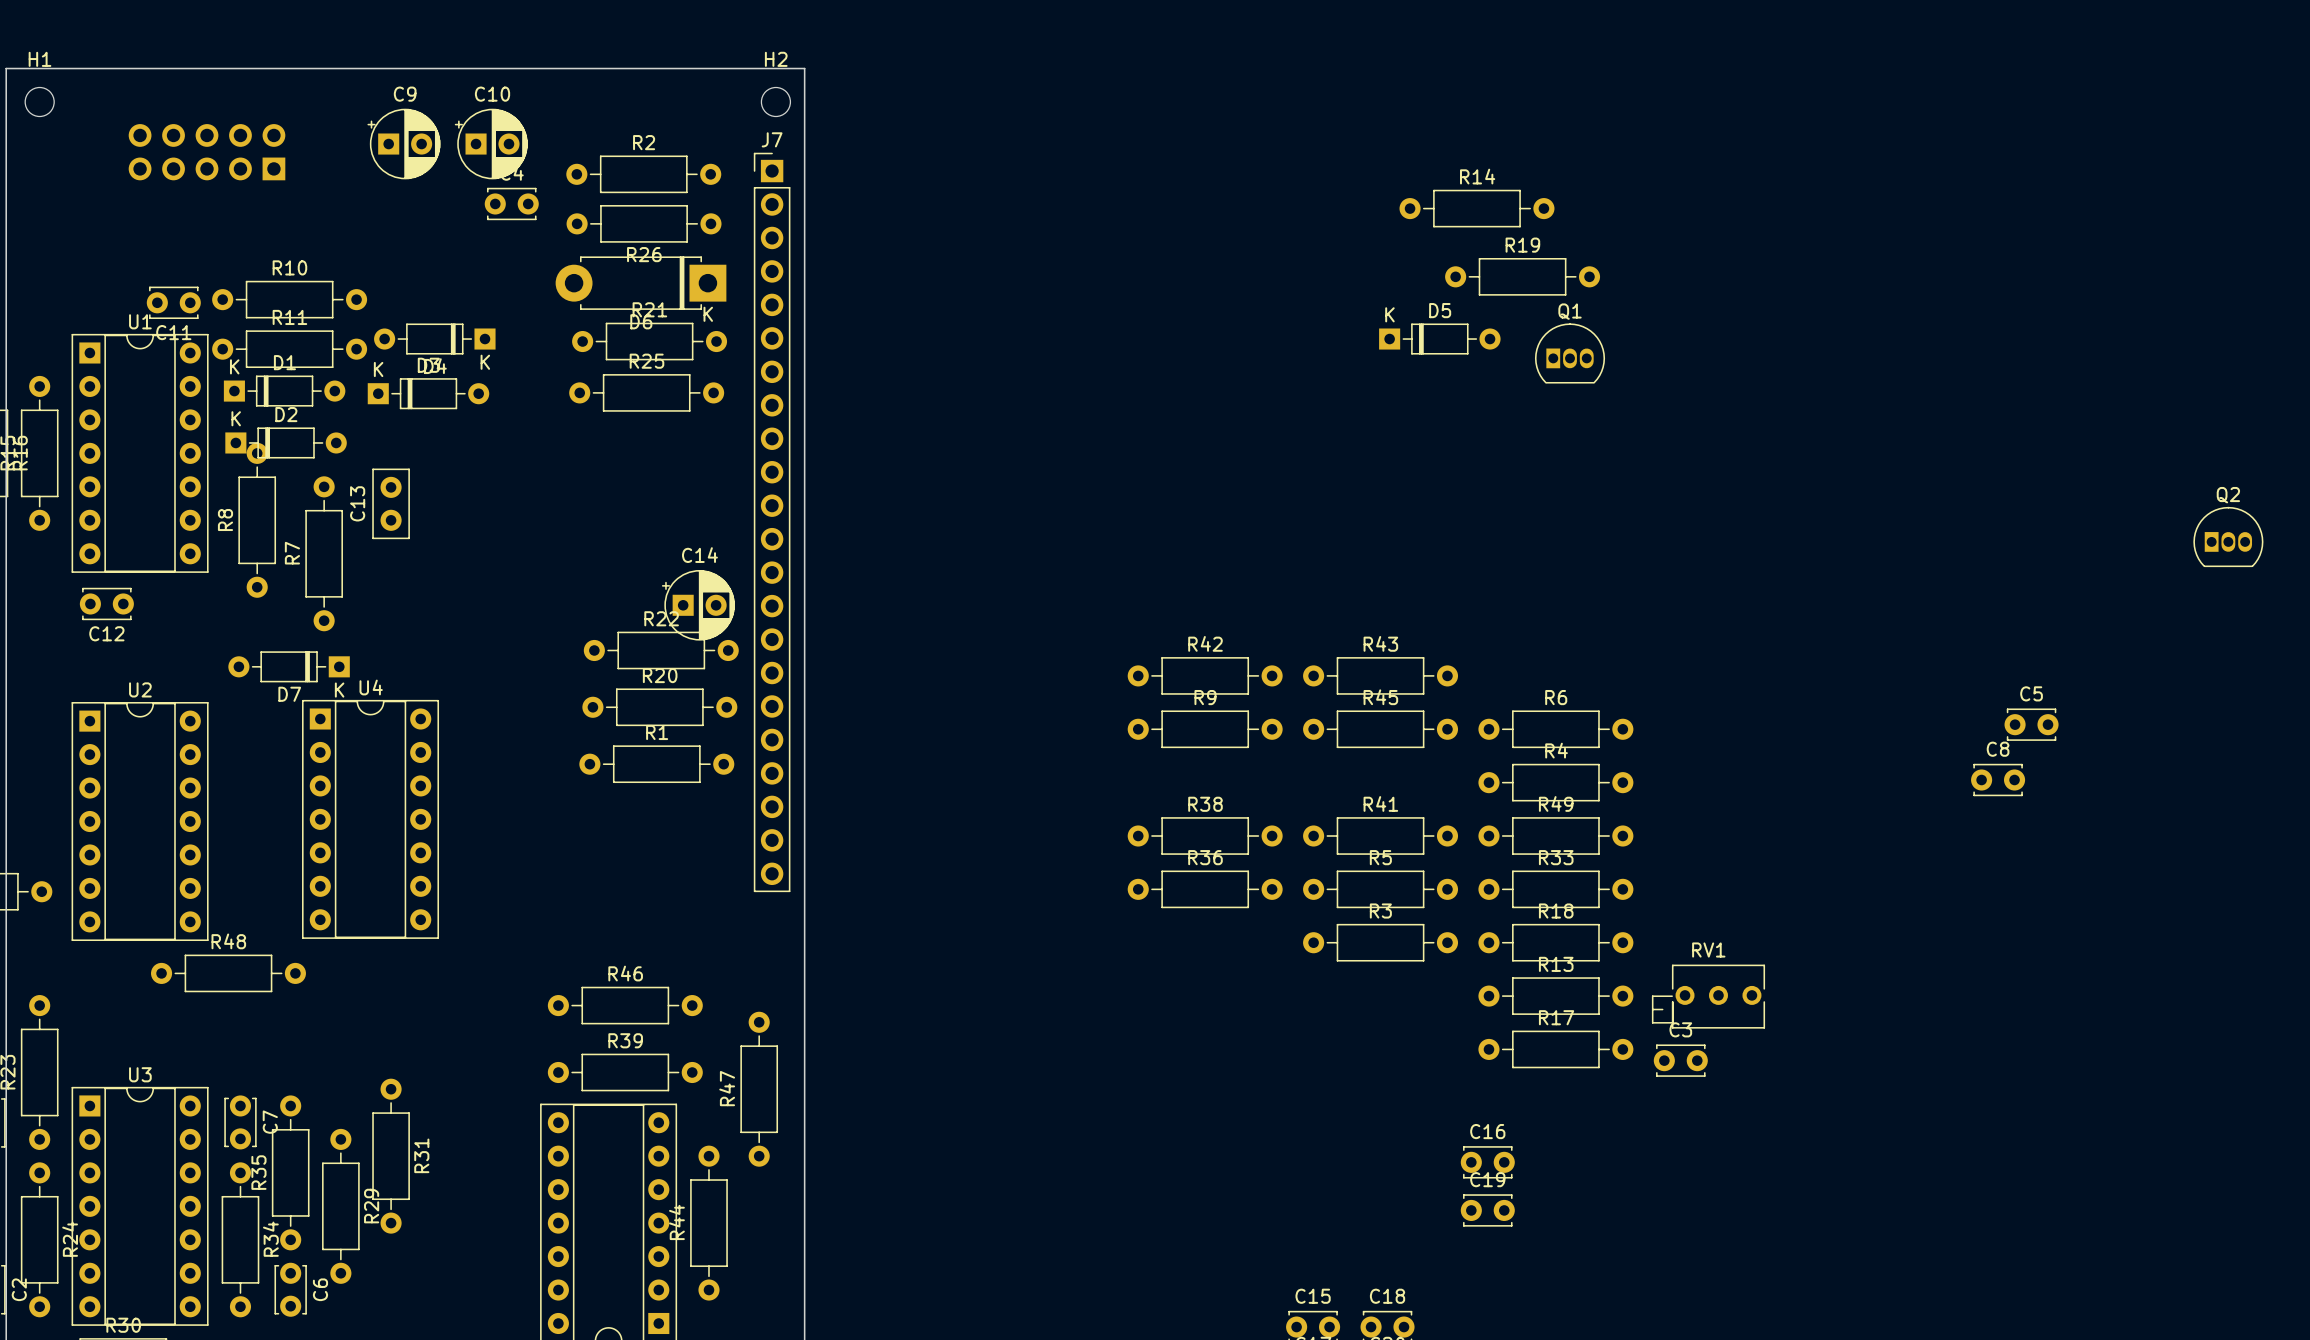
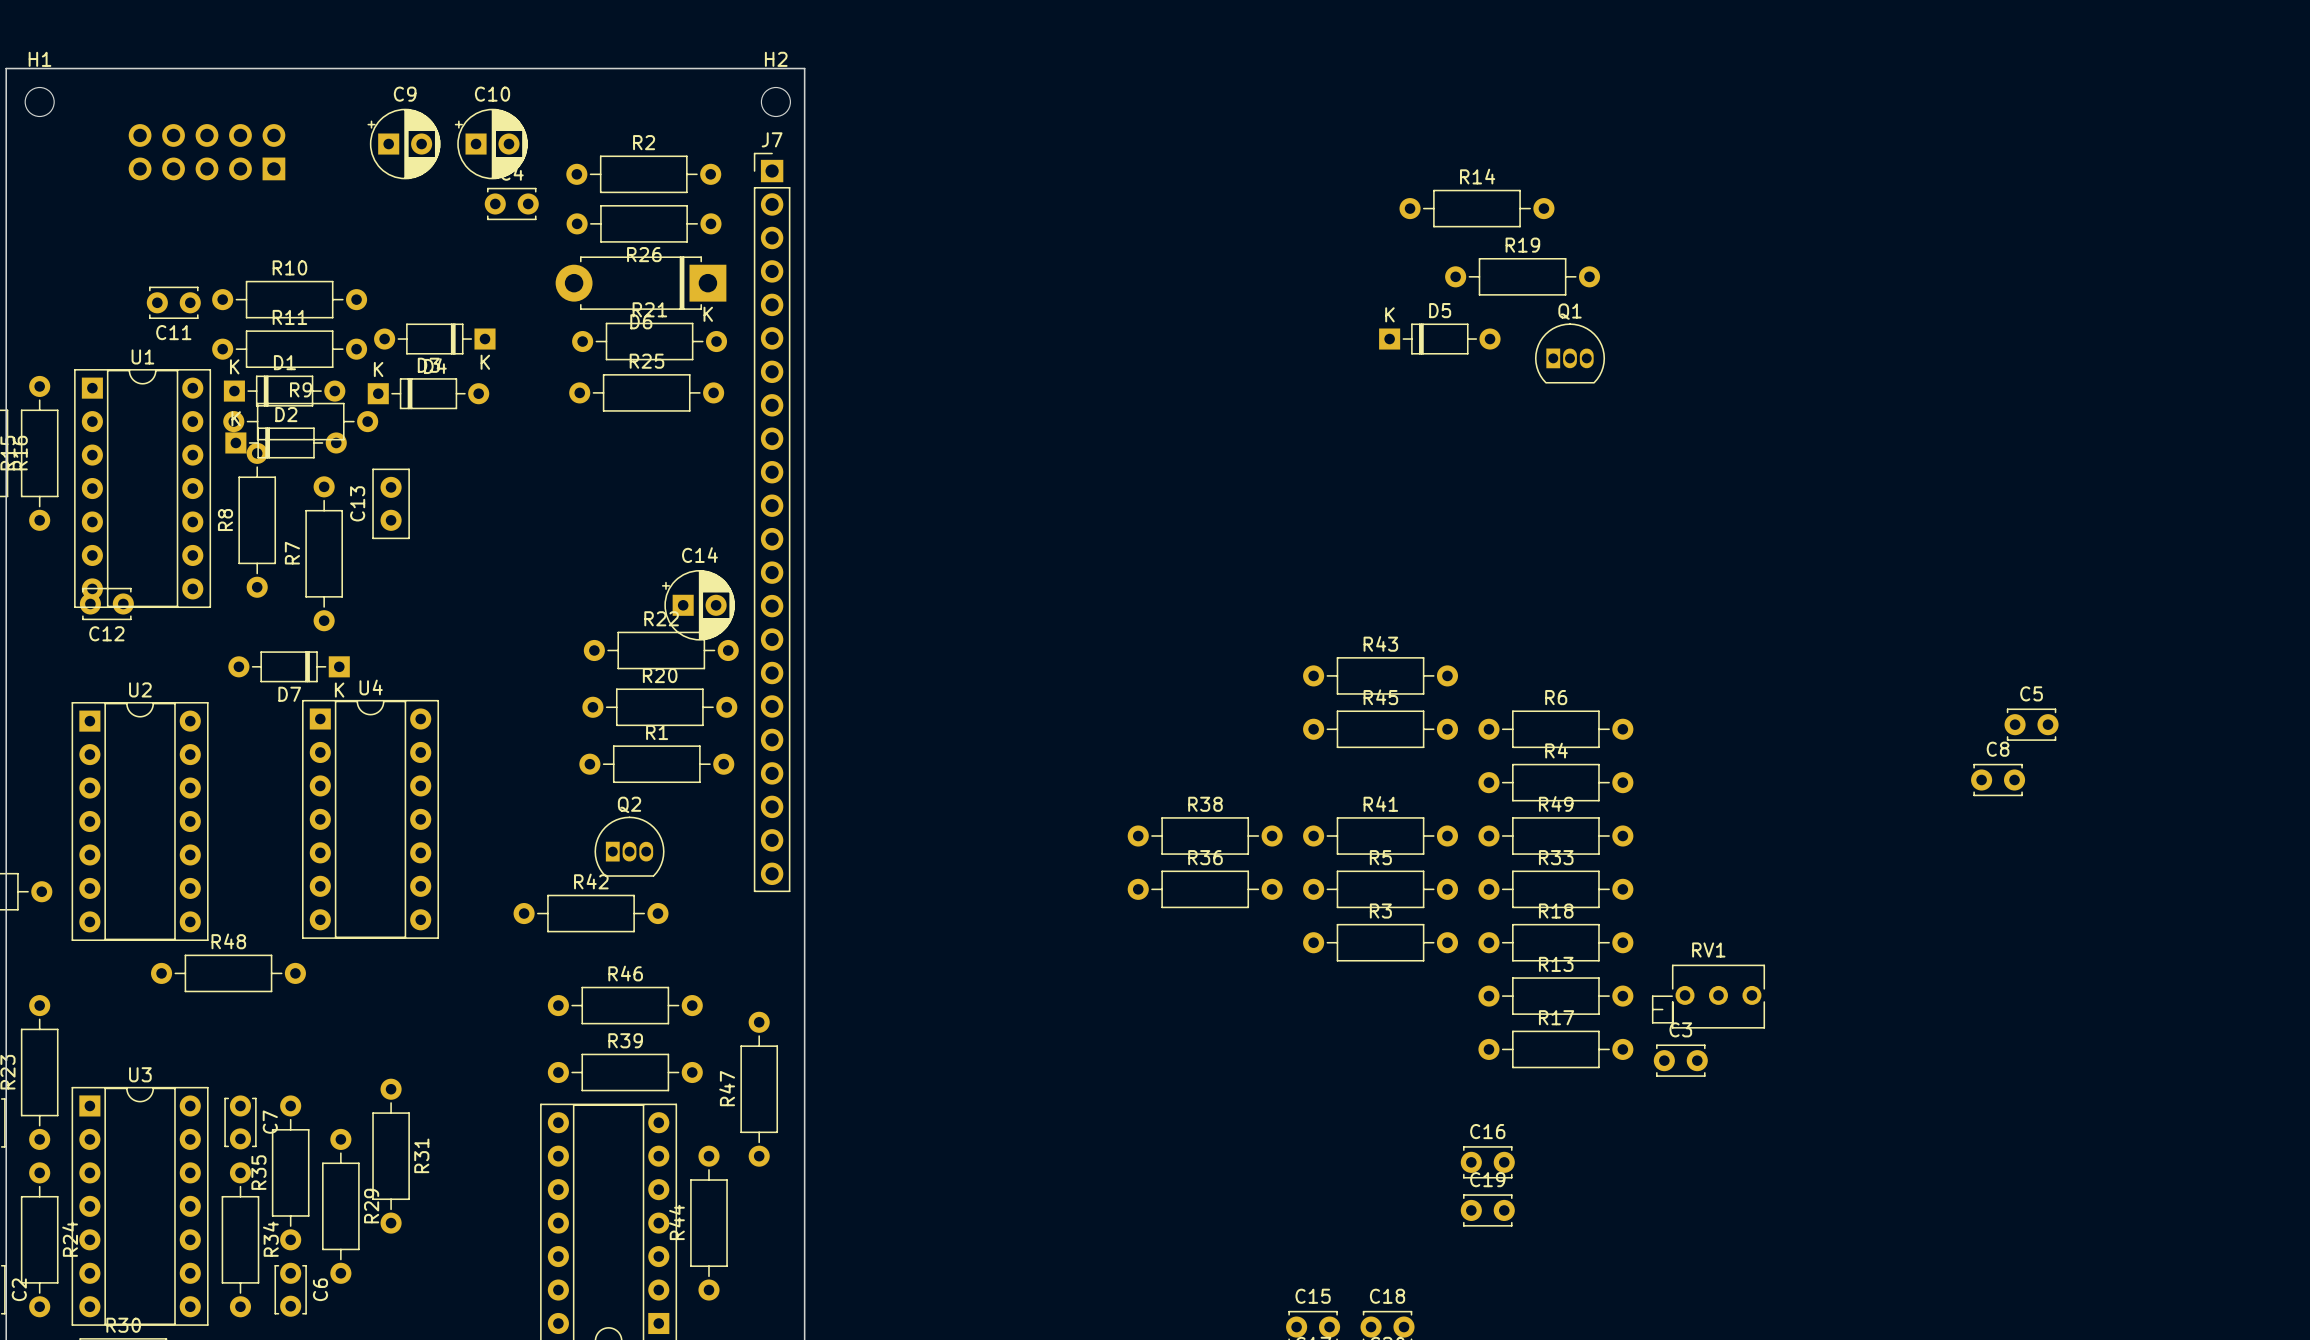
U1 position: (140, 453) -> (142, 488)
Q2 position: (2228, 536) -> (629, 846)
R42 position: (1205, 675) -> (591, 913)
R9 position: (1205, 729) -> (300, 421)

